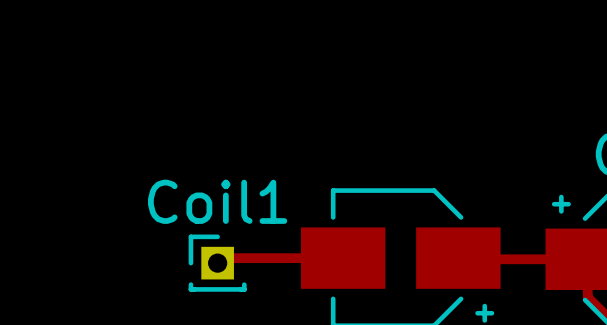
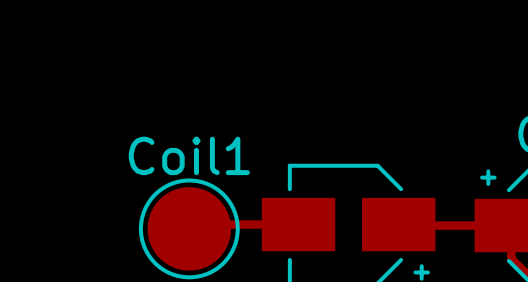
Coil1 footprint: [188, 234, 247, 292] -> [138, 178, 240, 280]

